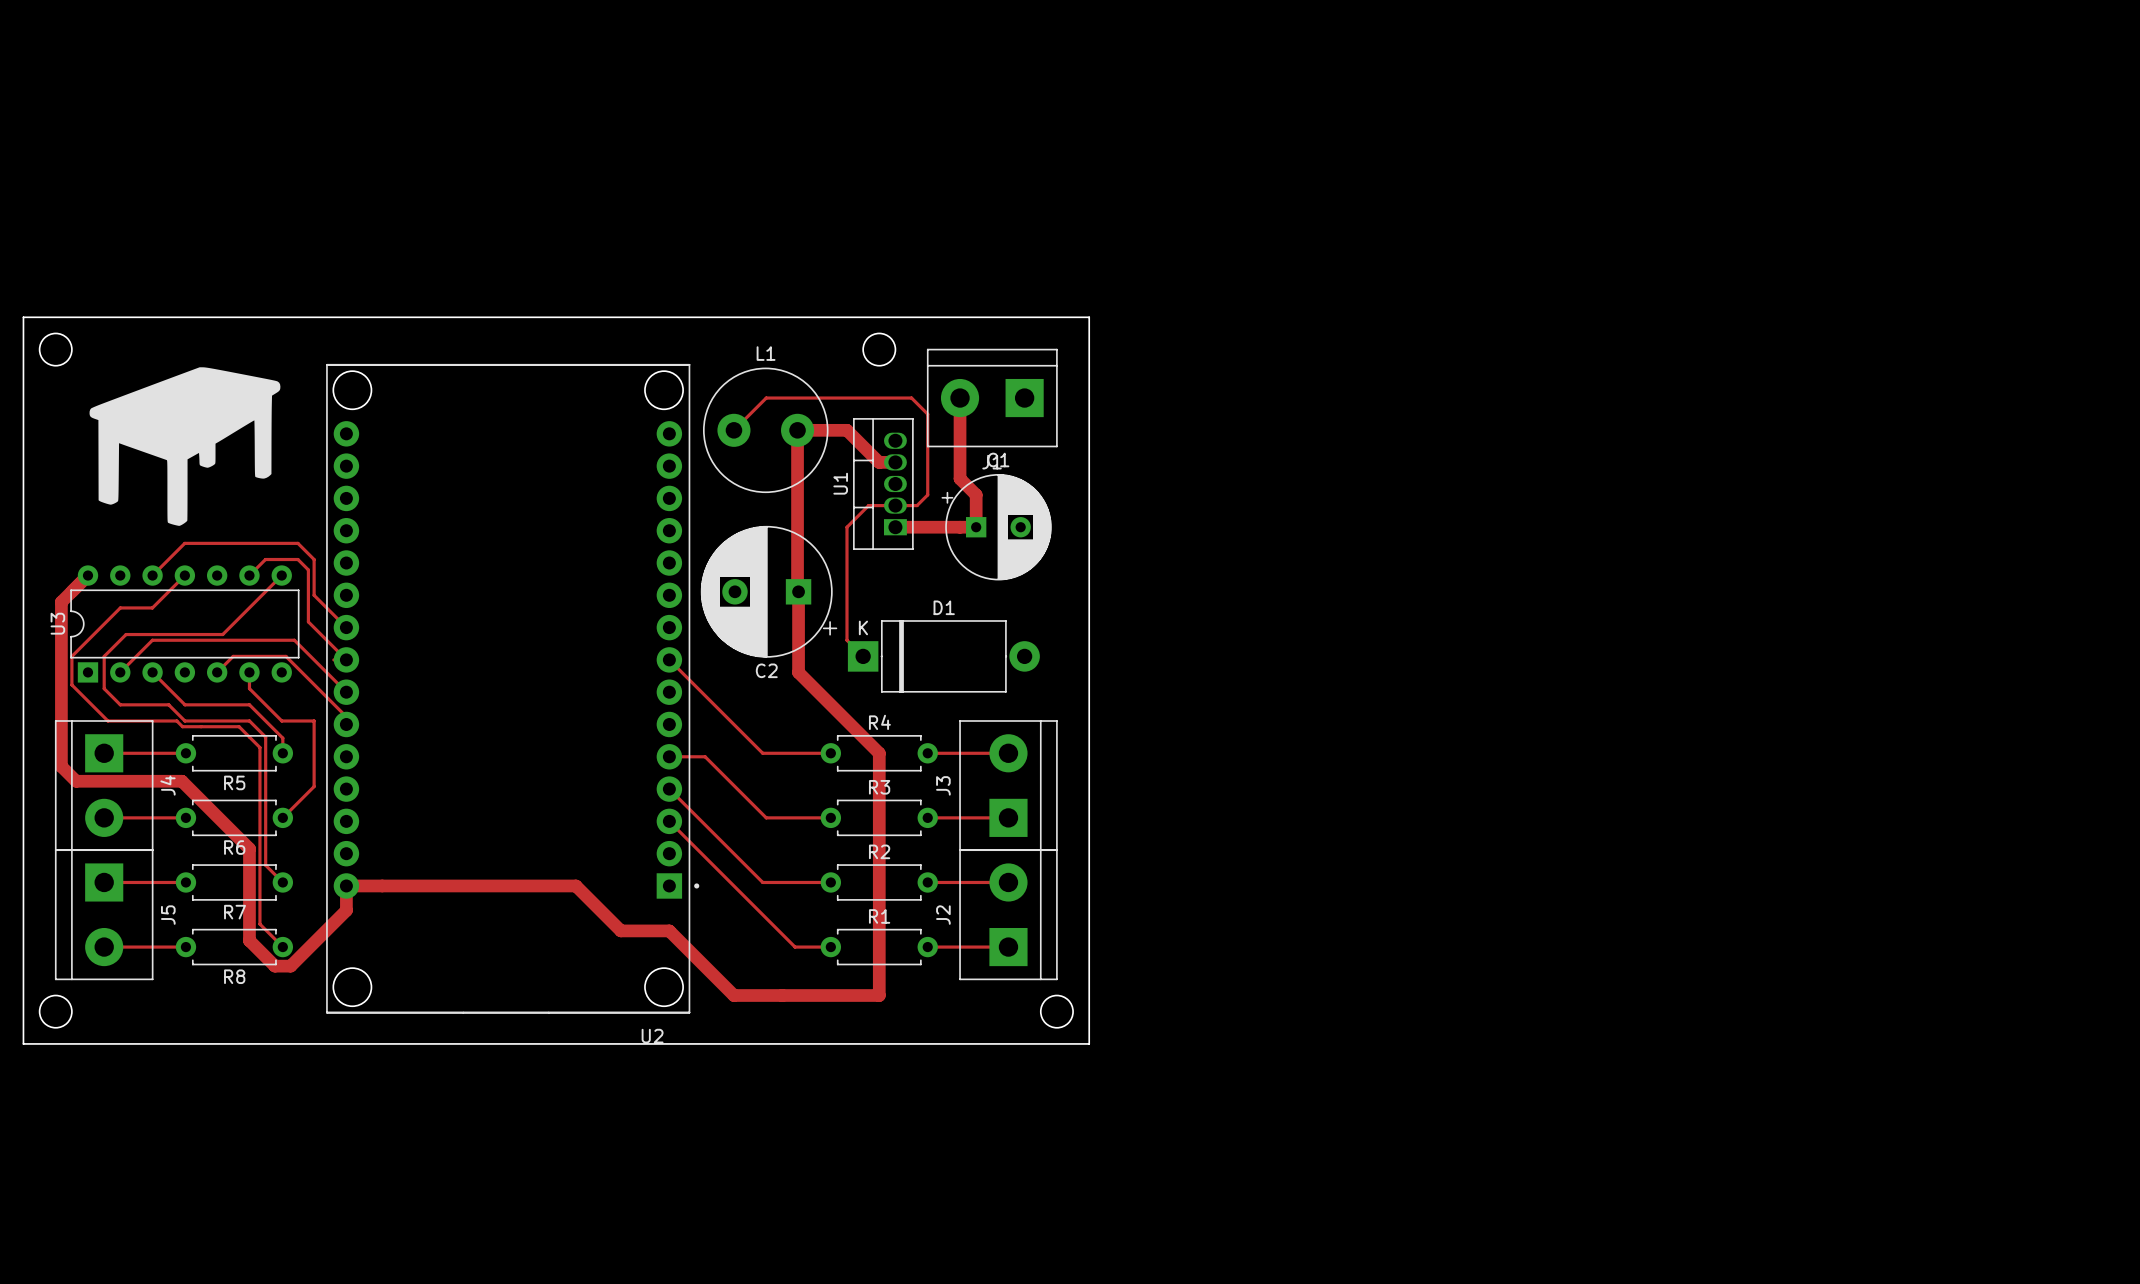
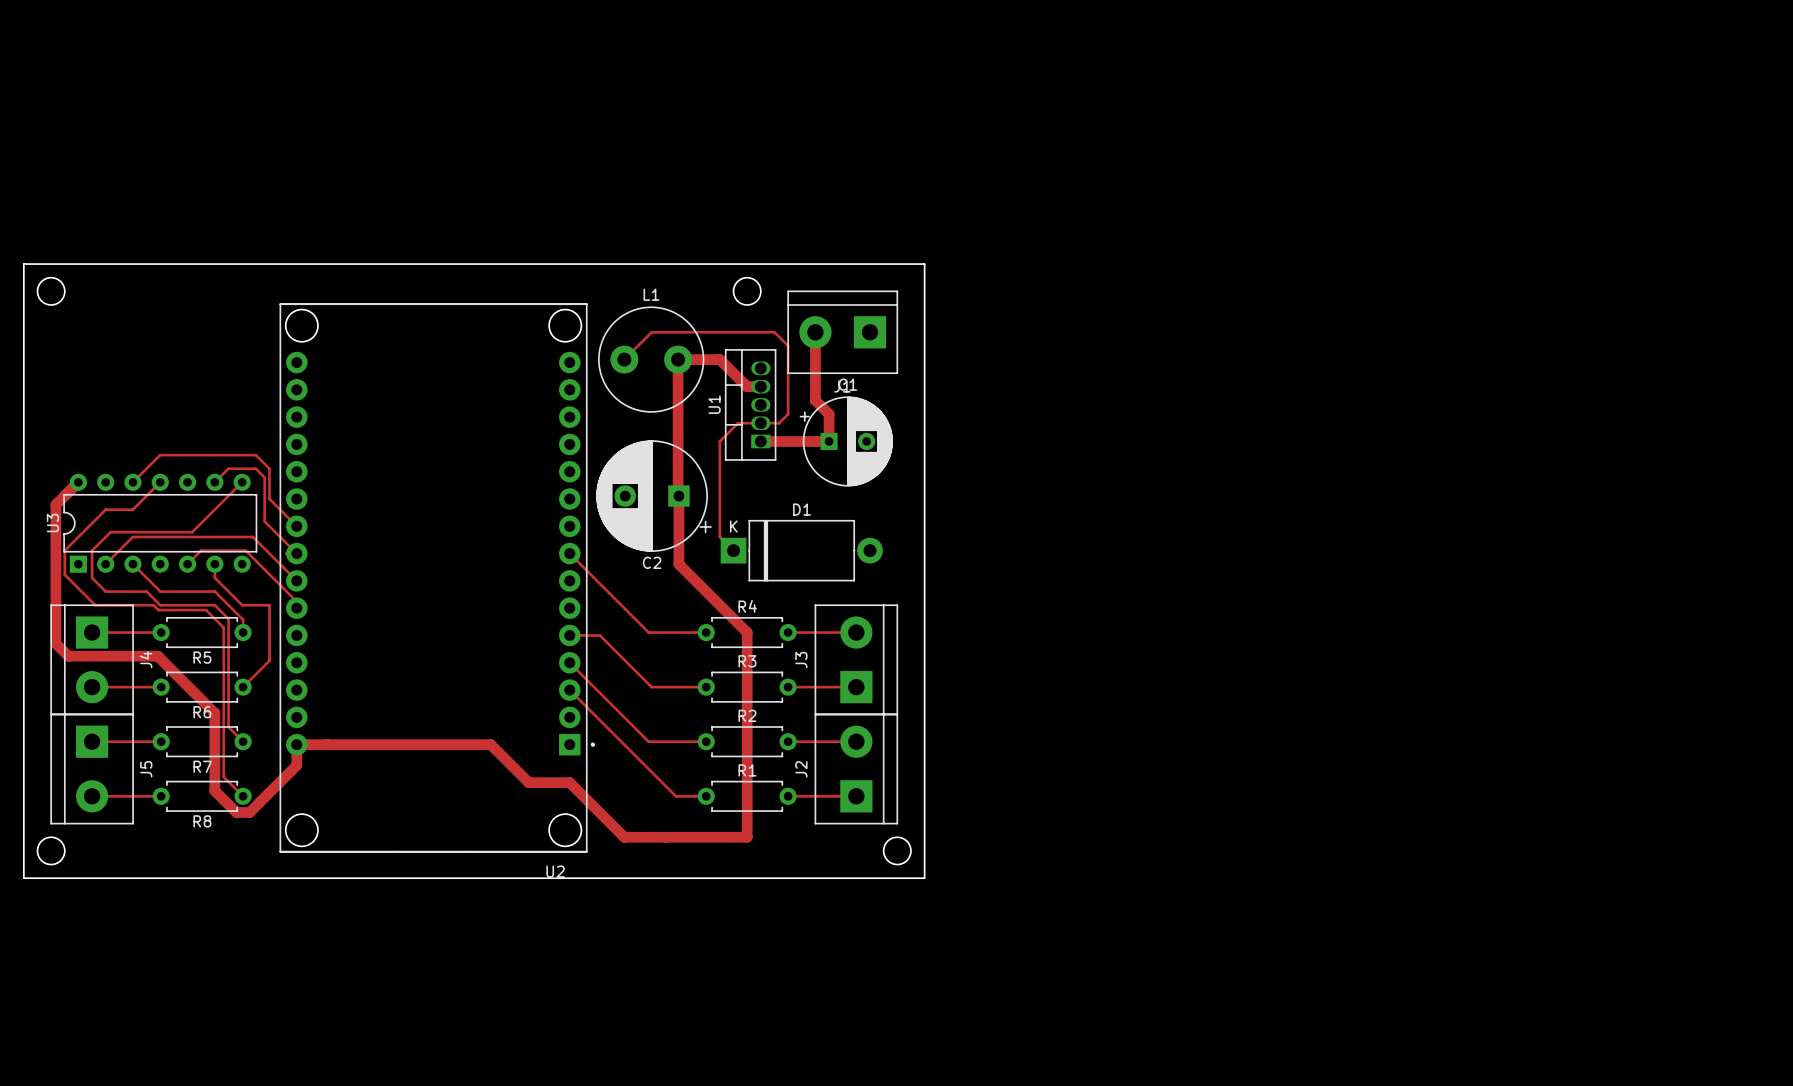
part: (184, 446) -> none

